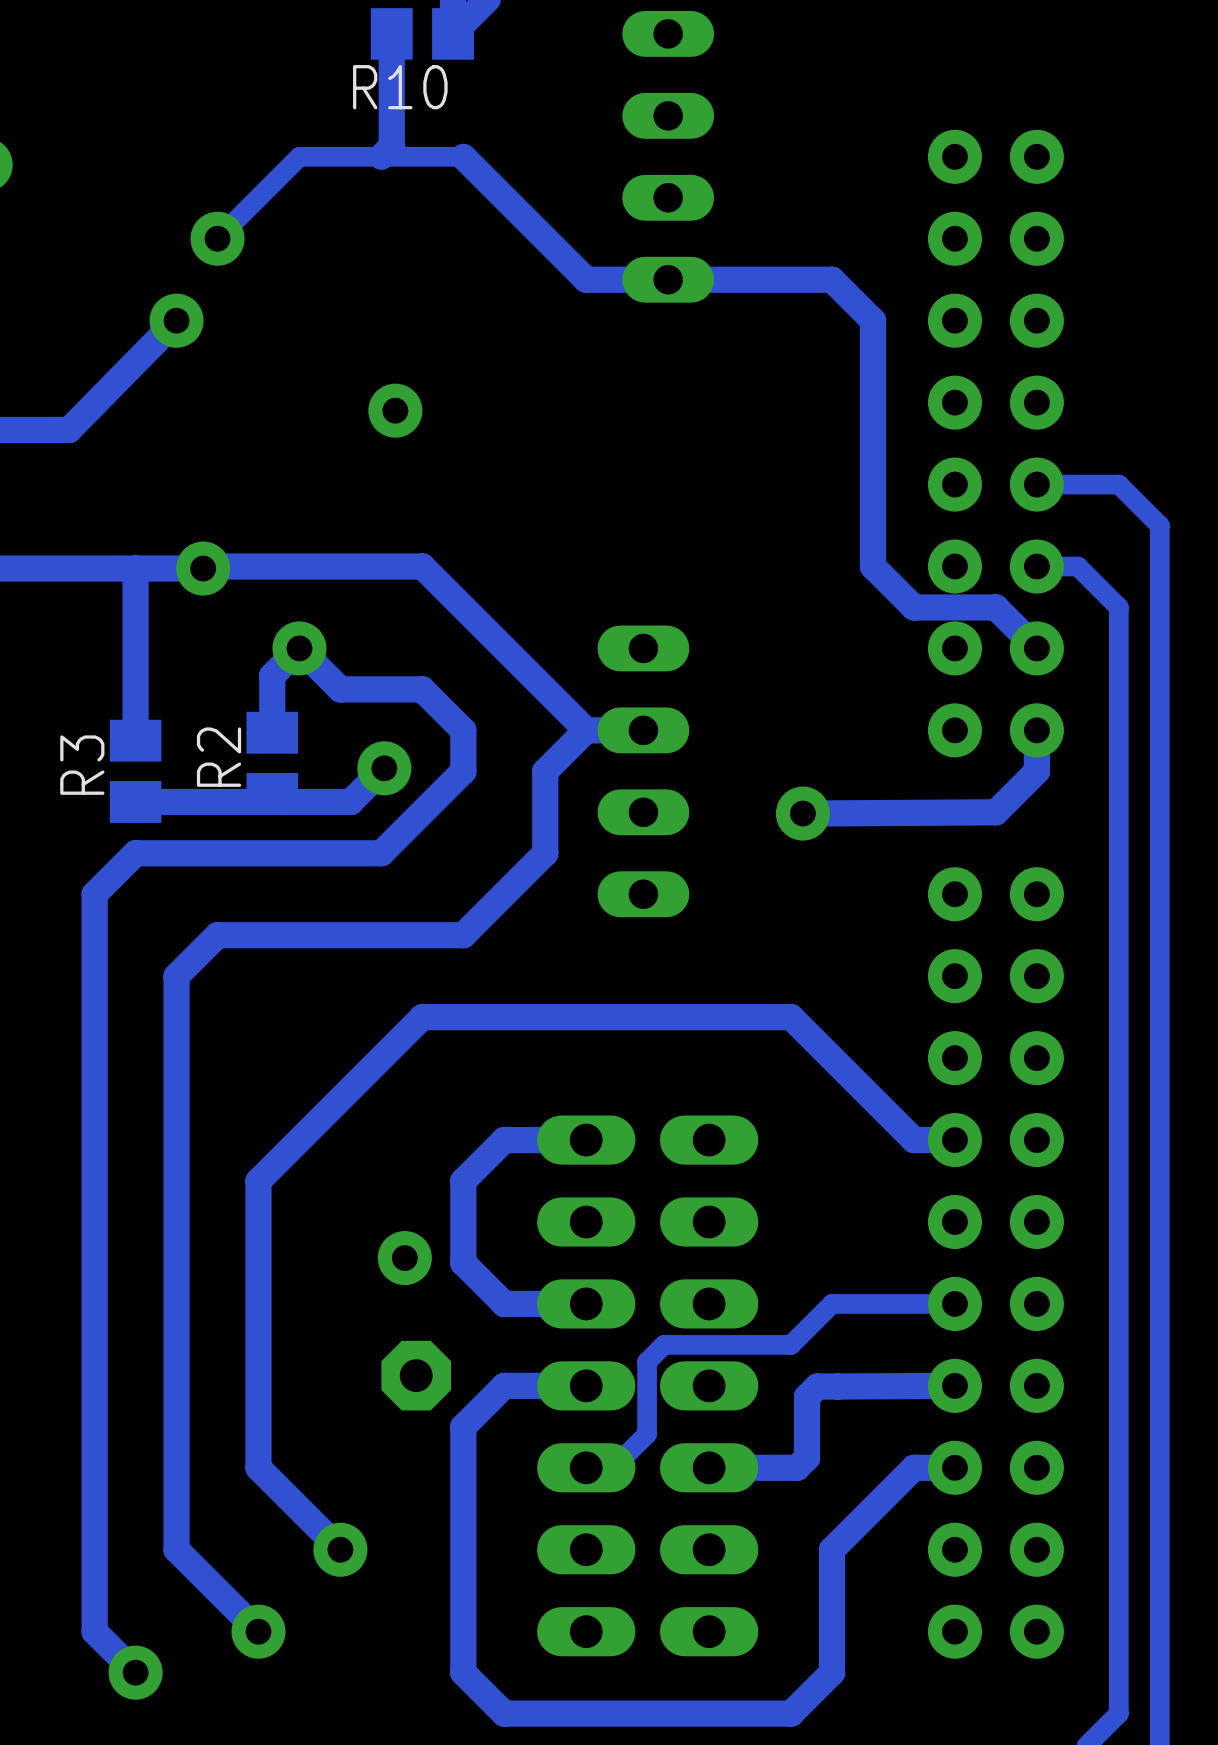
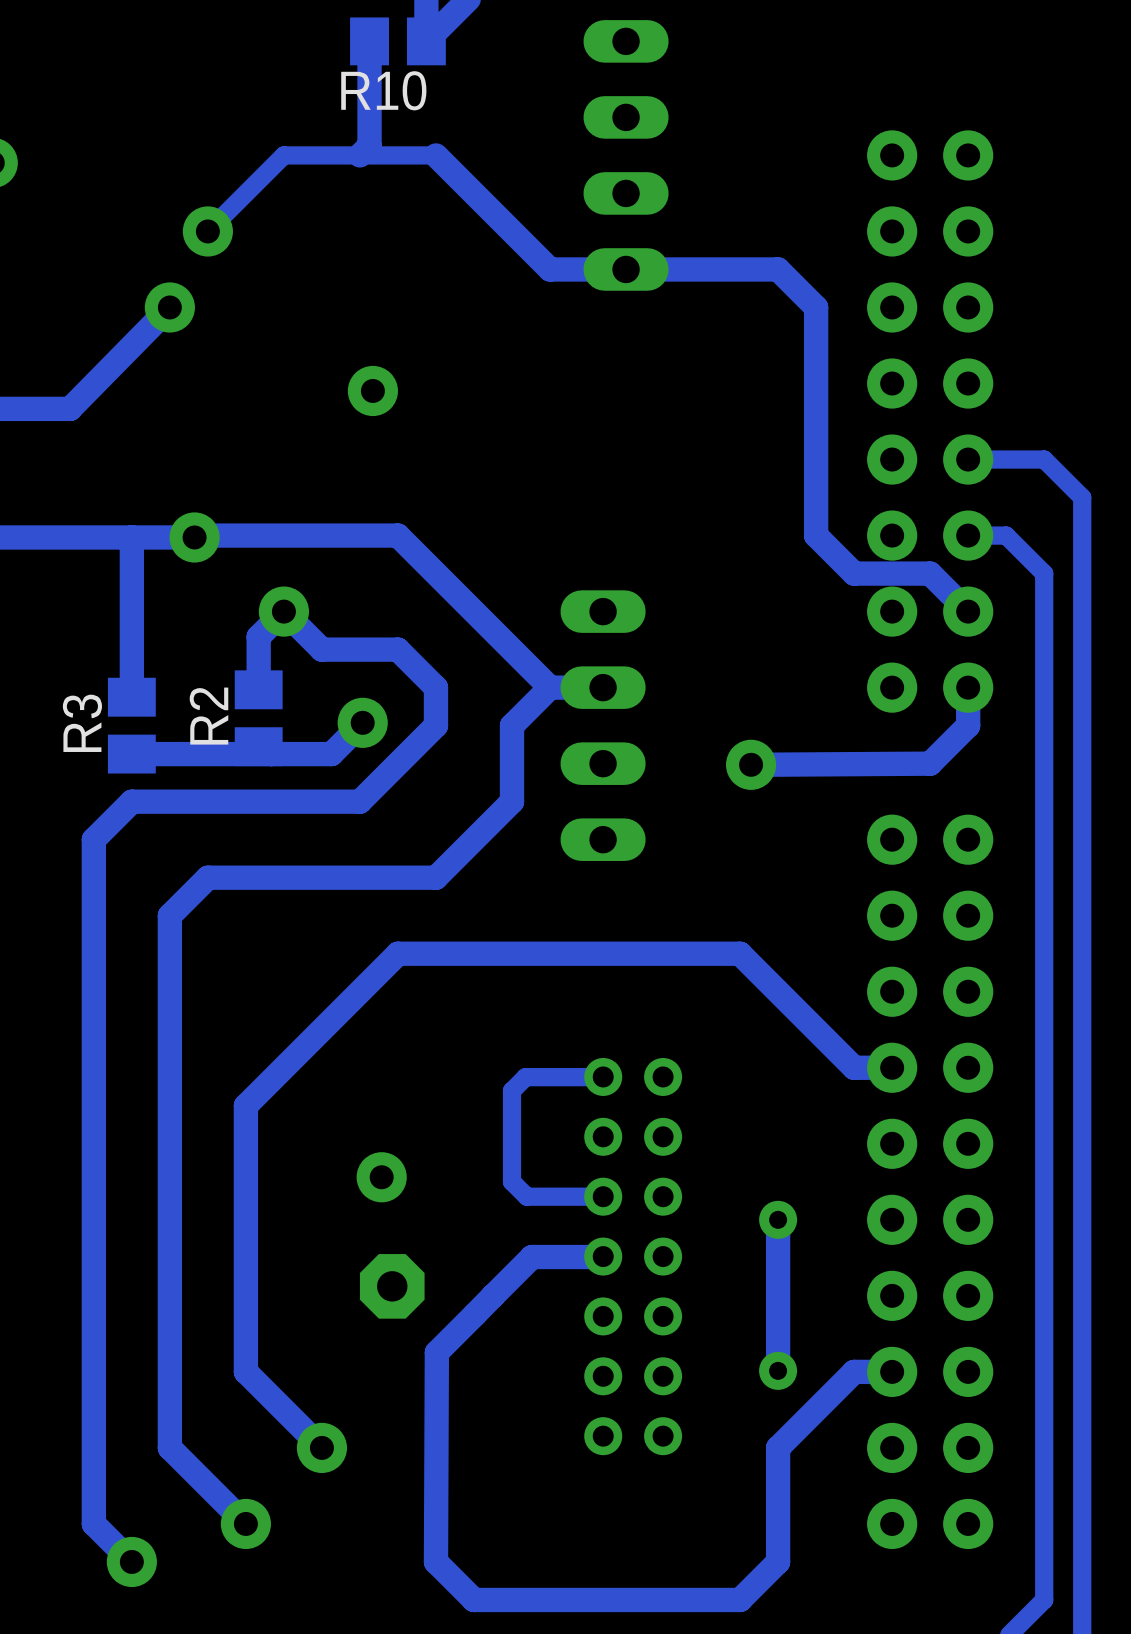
track: (586, 1140) (504, 1140) (463, 1181) (463, 1262) (504, 1303) (586, 1303) -> none
track: none -> (603, 1077) (525, 1077) (512, 1090) (512, 1181) (526, 1196) (603, 1196)
track: none -> (778, 1219) (778, 1370)
via: none -> (778, 1219)
track: (954, 1303) (832, 1303) (791, 1344) (664, 1344) (647, 1361) (647, 1434) (611, 1469) (588, 1469) (586, 1467) -> none
part: none -> (633, 1256)
track: (586, 1385) (504, 1385) (463, 1426) (463, 1672) -> (603, 1256) (532, 1257) (436, 1352) (435, 1561)
part: (586, 1385) -> none
part: (709, 1385) -> none
track: (954, 1385) (817, 1386) (807, 1396) (807, 1457) (797, 1467) (709, 1467) -> none
via: none -> (778, 1370)

